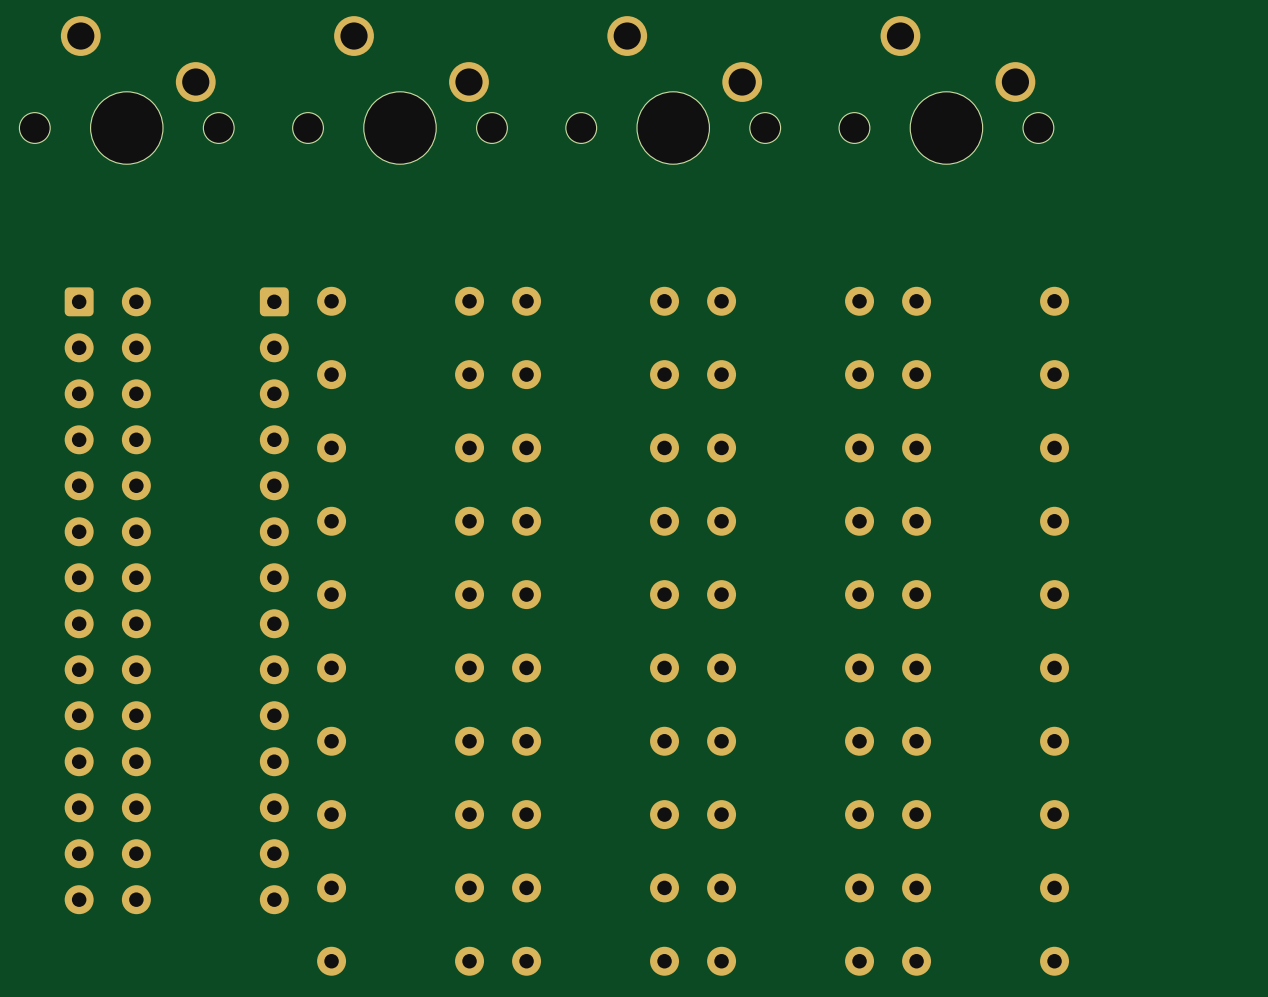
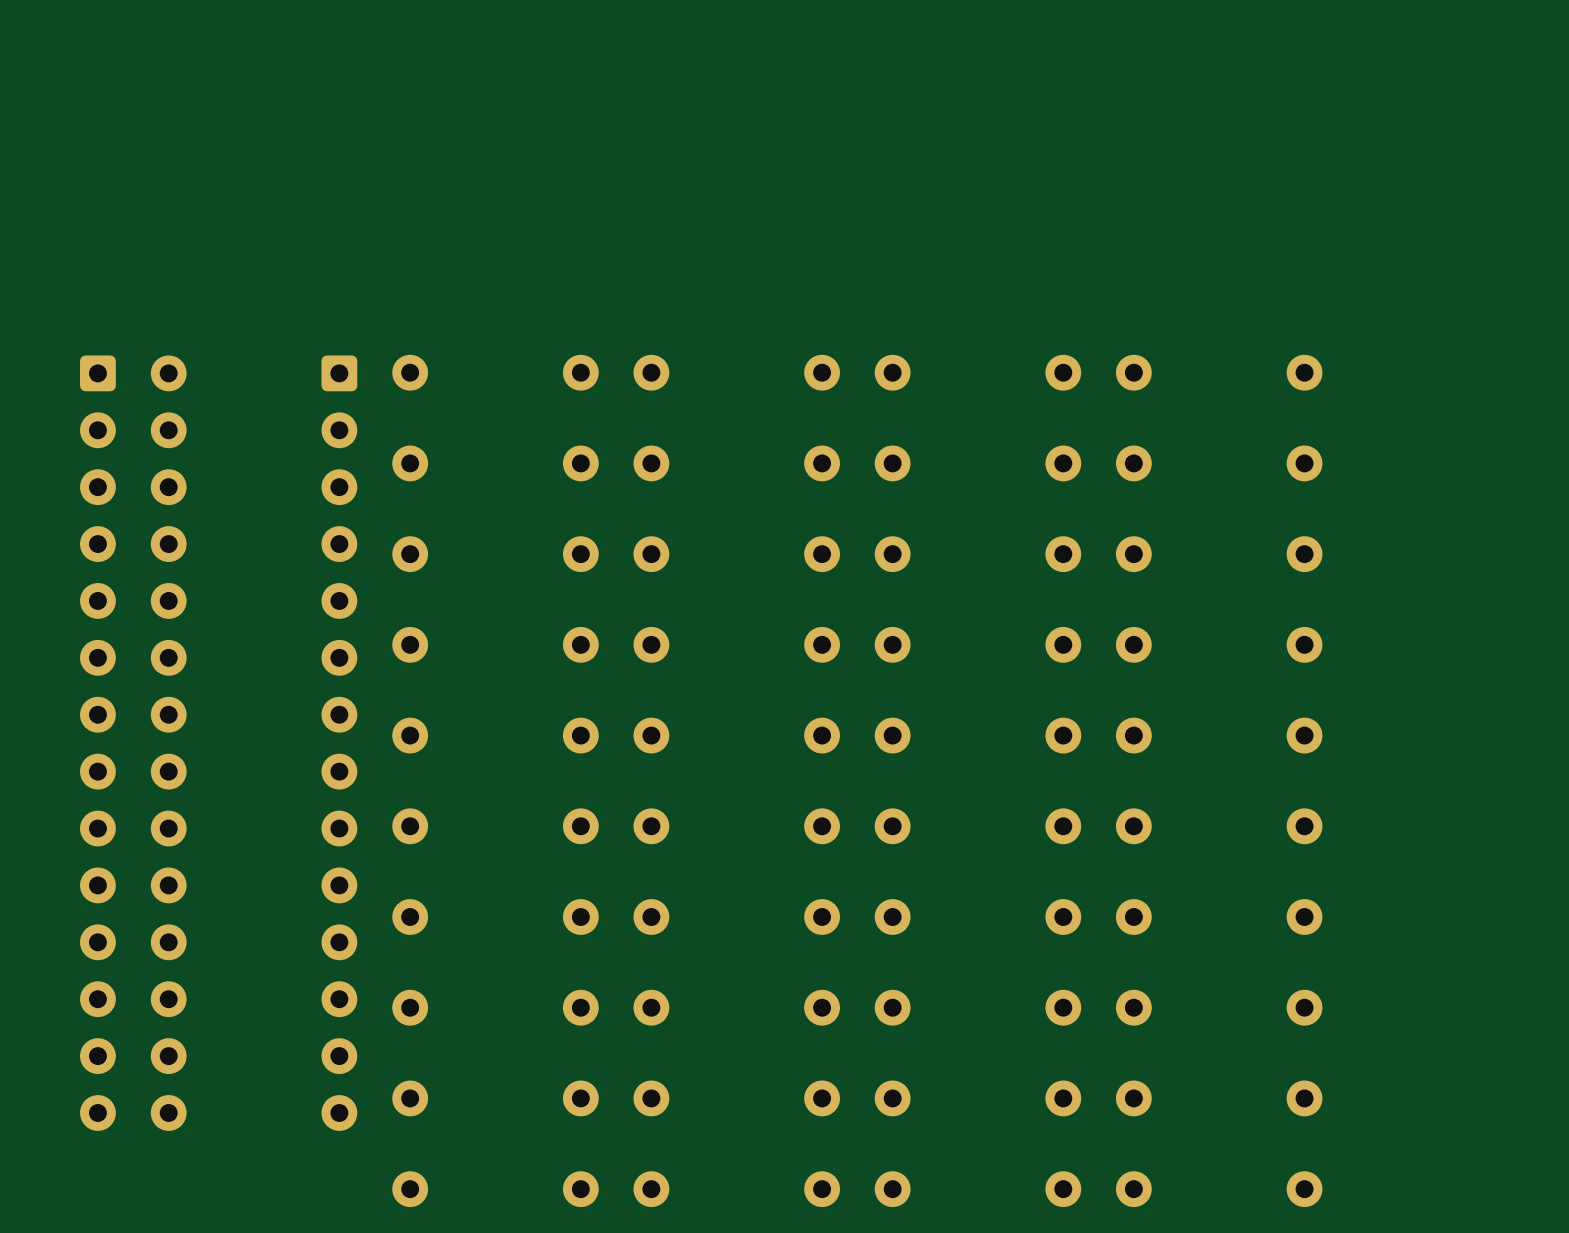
part: (126, 90) -> none
part: (400, 90) -> none
part: (673, 90) -> none
part: (946, 90) -> none

